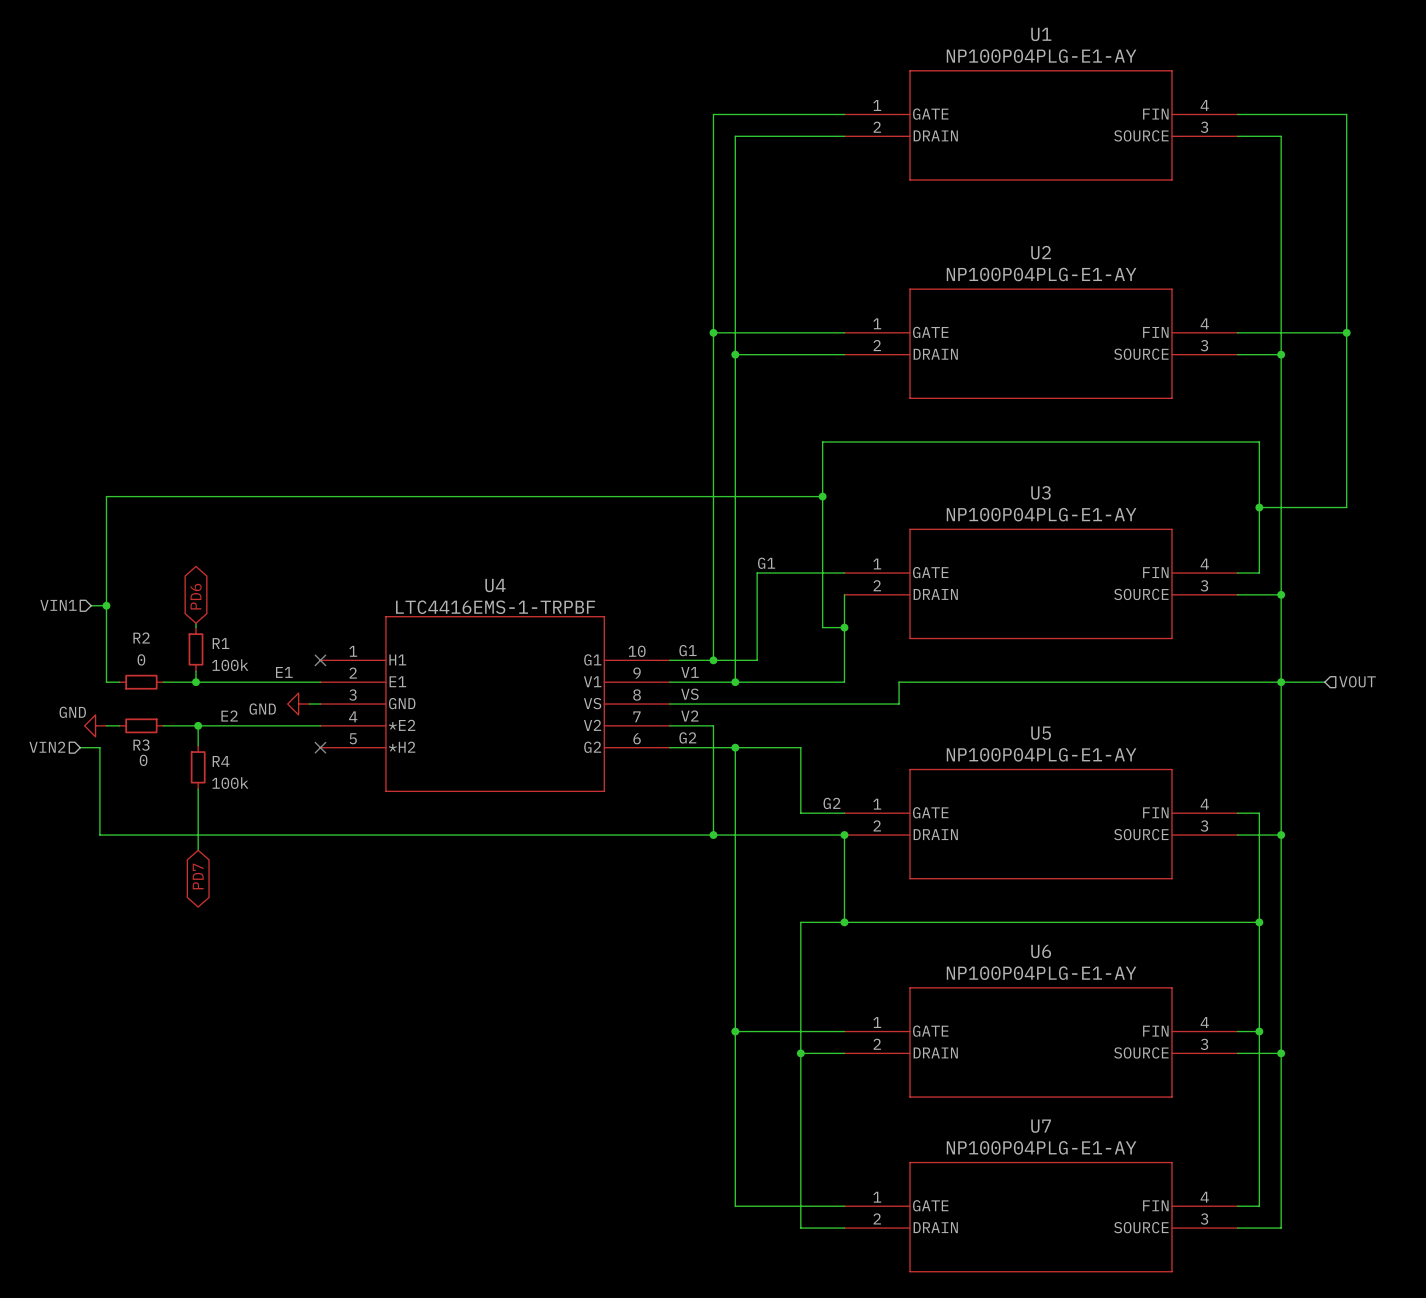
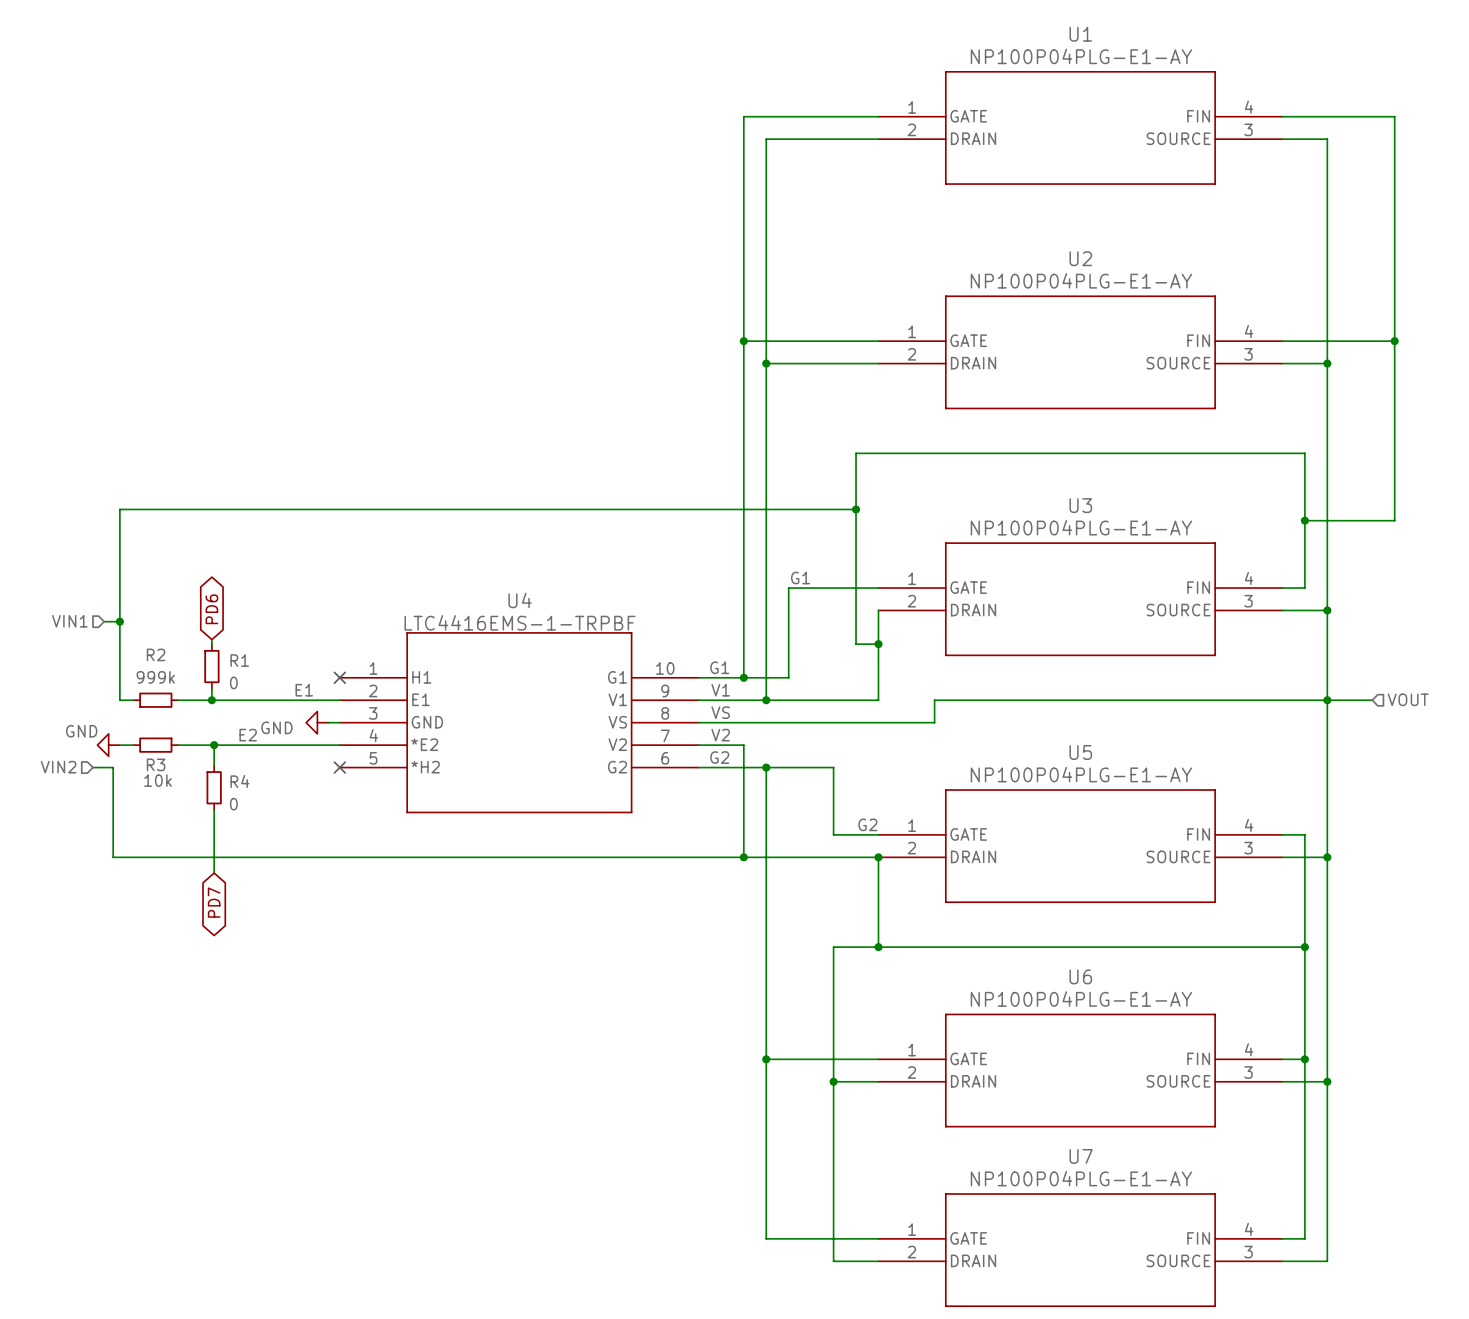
R2 value: 0 (141, 659) -> 999k (155, 677)
R1 value: 100k (230, 665) -> 0 (233, 682)
R3 value: 0 (143, 760) -> 10k (158, 780)
R4 value: 100k (230, 783) -> 0 (233, 804)

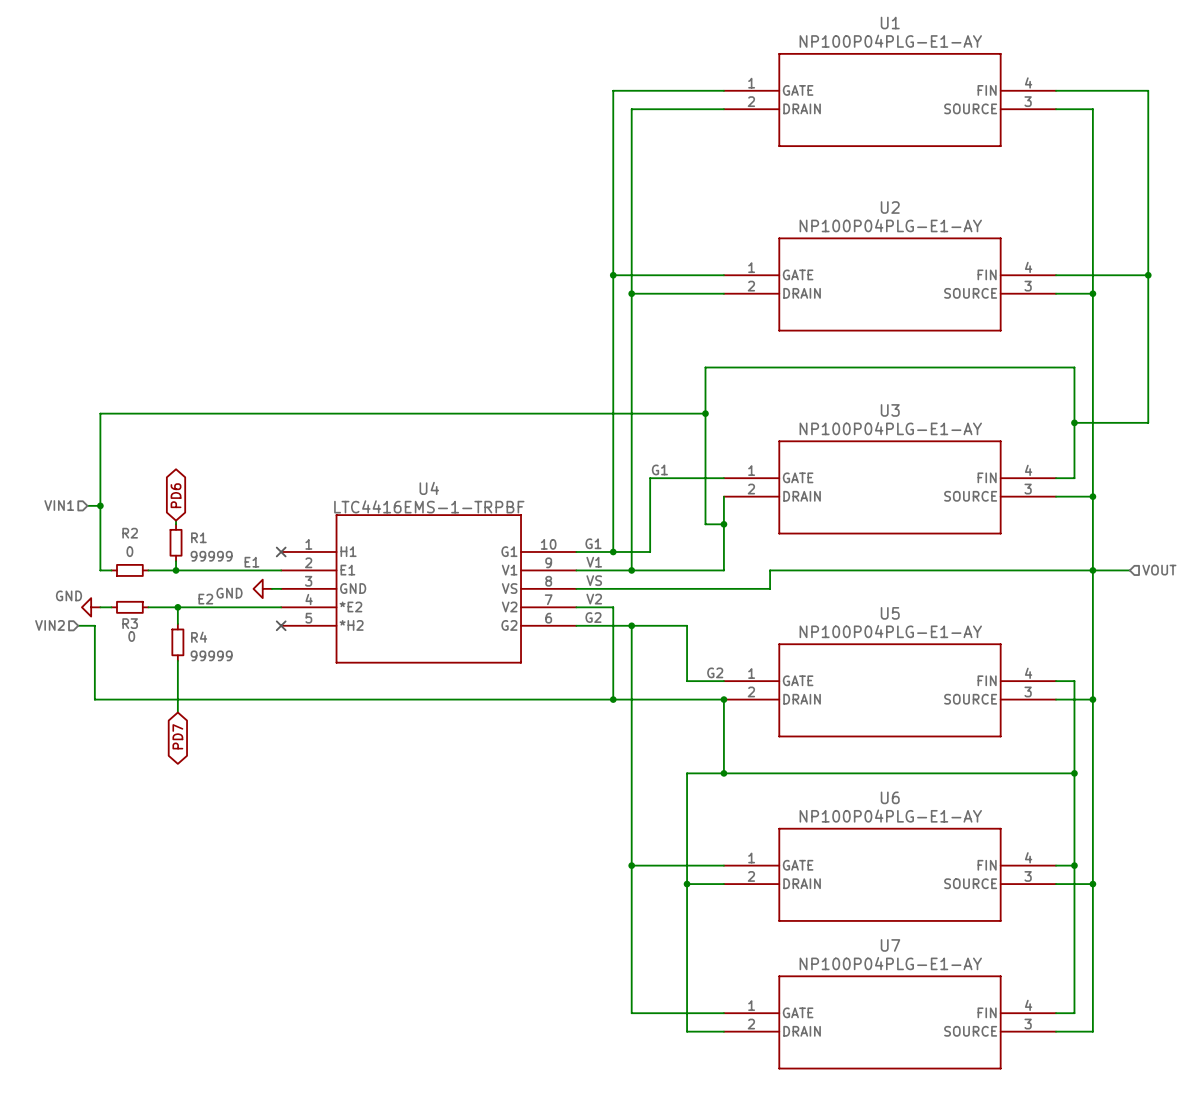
R2 value: 999k (155, 677) -> 0 (129, 551)
R1 value: 0 (233, 682) -> 99999 (211, 556)
R3 value: 10k (158, 780) -> 0 (131, 636)
R4 value: 0 (233, 804) -> 99999 (211, 655)

